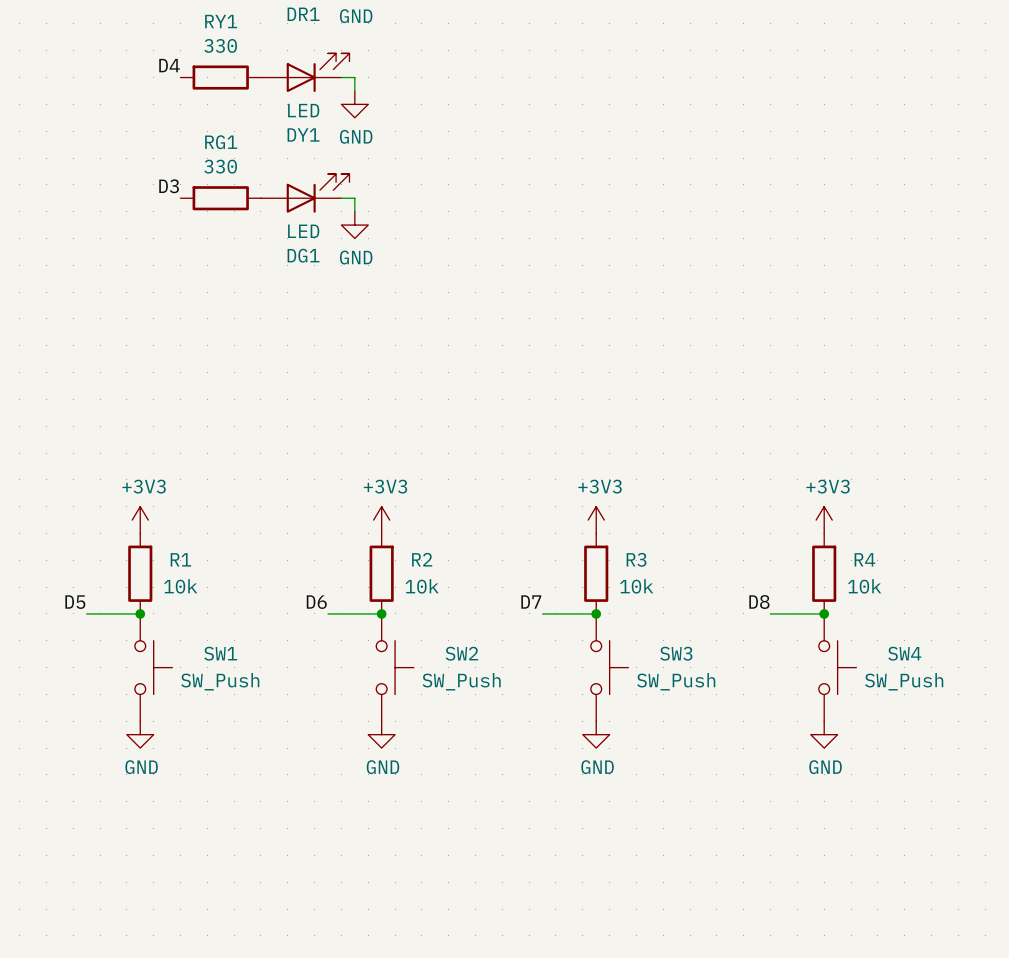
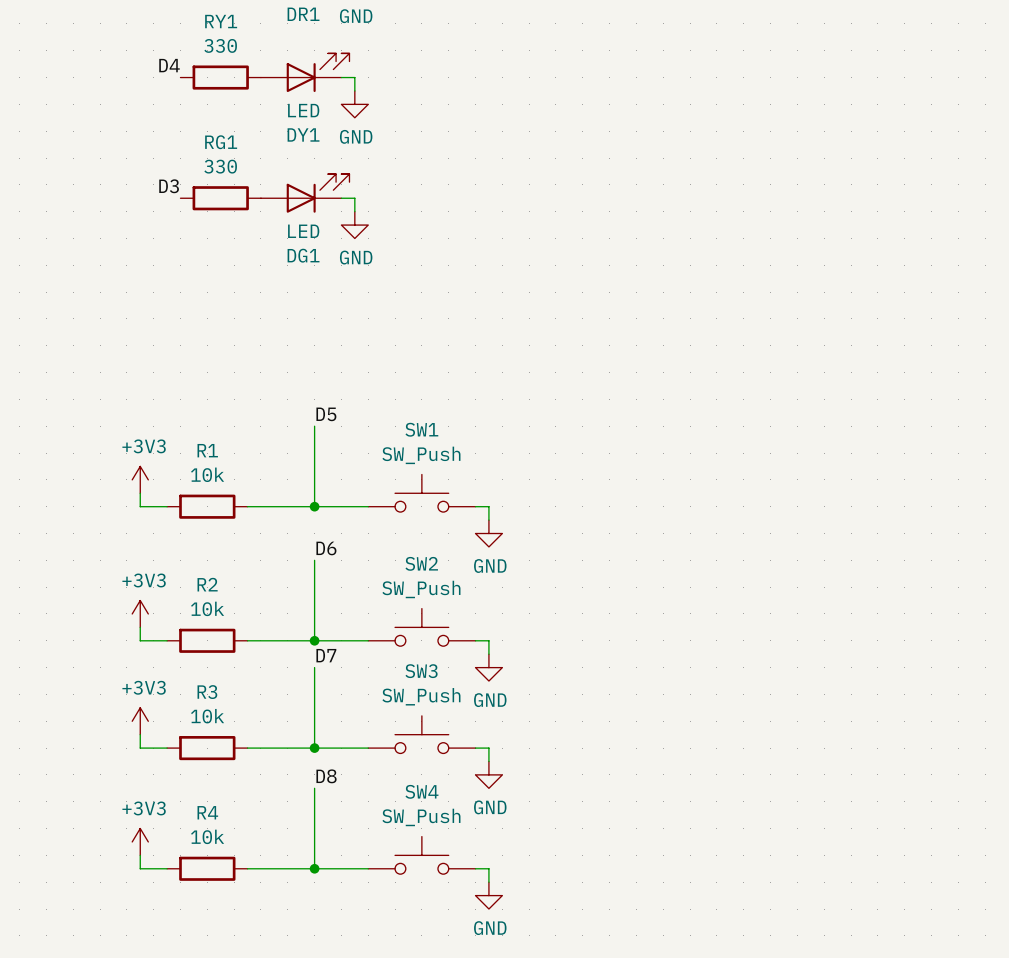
label: none -> D5 (326, 414)
wire: none -> (314, 426) (314, 506)
wire: none -> (140, 493) (140, 506) (167, 506)
wire: none -> (247, 506) (368, 506)
junction: none -> (314, 506)
wire: none -> (475, 506) (488, 506) (488, 520)
power symbol position: +3V3 (140, 520) -> +3V3 (140, 479)
power symbol: +3V3 (381, 520) -> none
power symbol: +3V3 (596, 520) -> none
power symbol: +3V3 (824, 520) -> none
power symbol: none -> GND (488, 533)
R1 name position: R1 (180, 559) -> R1 (207, 450)
R2 name position: R2 (422, 559) -> R2 (207, 584)
R3 name position: R3 (636, 559) -> R3 (207, 692)
R4 name position: R4 (864, 559) -> R4 (207, 812)
wire: none -> (314, 560) (314, 640)
R1 rotation: 0° (140, 573) -> 90° clockwise (207, 506)
R1 position: (140, 573) -> (207, 506)
R2 rotation: 0° (381, 573) -> 90° clockwise (207, 640)
R2 position: (381, 573) -> (207, 640)
R3 rotation: 0° (596, 573) -> 90° clockwise (207, 748)
R3 position: (596, 573) -> (207, 748)
R4 rotation: 0° (824, 573) -> 90° clockwise (207, 868)
R4 position: (824, 573) -> (207, 868)
R1 value position: 10k (180, 586) -> 10k (207, 474)
R2 value position: 10k (422, 586) -> 10k (207, 608)
R3 value position: 10k (636, 586) -> 10k (207, 716)
R4 value position: 10k (864, 586) -> 10k (207, 836)
label: D5 (75, 602) -> none
label position: D6 (316, 602) -> D6 (326, 548)
label position: D7 (531, 602) -> D7 (326, 655)
label: D8 (759, 602) -> none
wire: (86, 613) (140, 613) -> none
power symbol: none -> +3V3 (140, 613)
junction: (140, 613) -> none
wire: (328, 613) (381, 613) -> none
junction: (381, 613) -> none
wire: (542, 613) (596, 613) -> none
junction: (596, 613) -> none
wire: (770, 613) (824, 613) -> none
junction: (824, 613) -> none
wire: none -> (140, 627) (140, 640) (167, 640)
wire: none -> (247, 640) (368, 640)
junction: none -> (314, 640)
wire: none -> (475, 640) (488, 640) (488, 654)
SW1 rotation: 0° (153, 667) -> 90° counterclockwise (421, 493)
SW1 position: (153, 667) -> (421, 493)
wire: none -> (314, 667) (314, 748)
SW2 rotation: 0° (395, 667) -> 90° counterclockwise (421, 627)
power symbol: none -> GND (488, 667)
SW3 rotation: 0° (609, 667) -> 90° counterclockwise (421, 734)
SW3 position: (609, 667) -> (421, 734)
SW4 rotation: 0° (837, 667) -> 90° counterclockwise (421, 855)
SW4 position: (837, 667) -> (421, 855)
SW1 value position: SW_Push (220, 681) -> SW_Push (421, 455)
SW2 value position: SW_Push (461, 681) -> SW_Push (421, 589)
SW3 value position: SW_Push (676, 681) -> SW_Push (421, 696)
SW4 value position: SW_Push (904, 681) -> SW_Push (421, 817)
power symbol: none -> +3V3 (140, 721)
wire: none -> (140, 734) (140, 748) (167, 748)
power symbol: GND (140, 734) -> none
power symbol: GND (381, 734) -> none
power symbol: GND (596, 734) -> none
power symbol: GND (824, 734) -> none
wire: none -> (247, 748) (368, 748)
junction: none -> (314, 748)
wire: none -> (475, 748) (488, 748) (488, 761)
power symbol: none -> GND (488, 774)
label: none -> D8 (326, 776)
wire: none -> (314, 788) (314, 868)
power symbol: none -> +3V3 (140, 841)
wire: none -> (140, 855) (140, 868) (167, 868)
wire: none -> (247, 868) (368, 868)
junction: none -> (314, 868)
wire: none -> (475, 868) (488, 868) (488, 882)
power symbol: none -> GND (488, 895)

